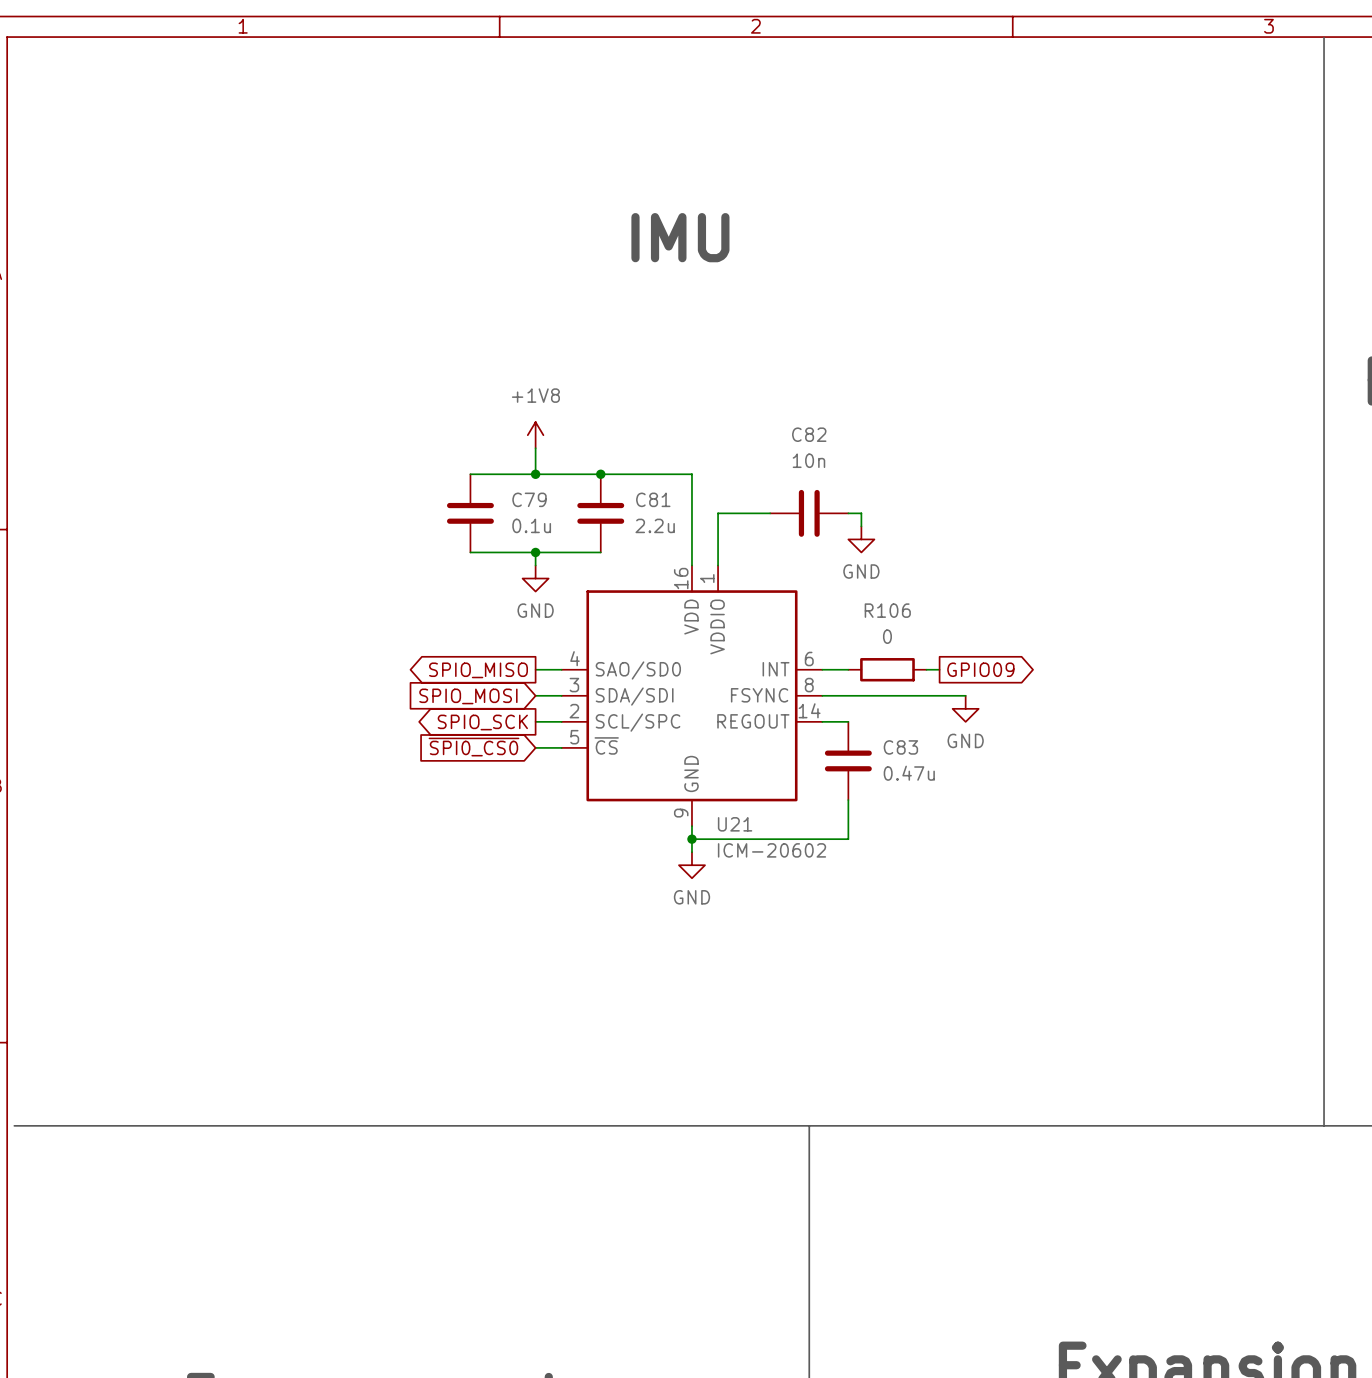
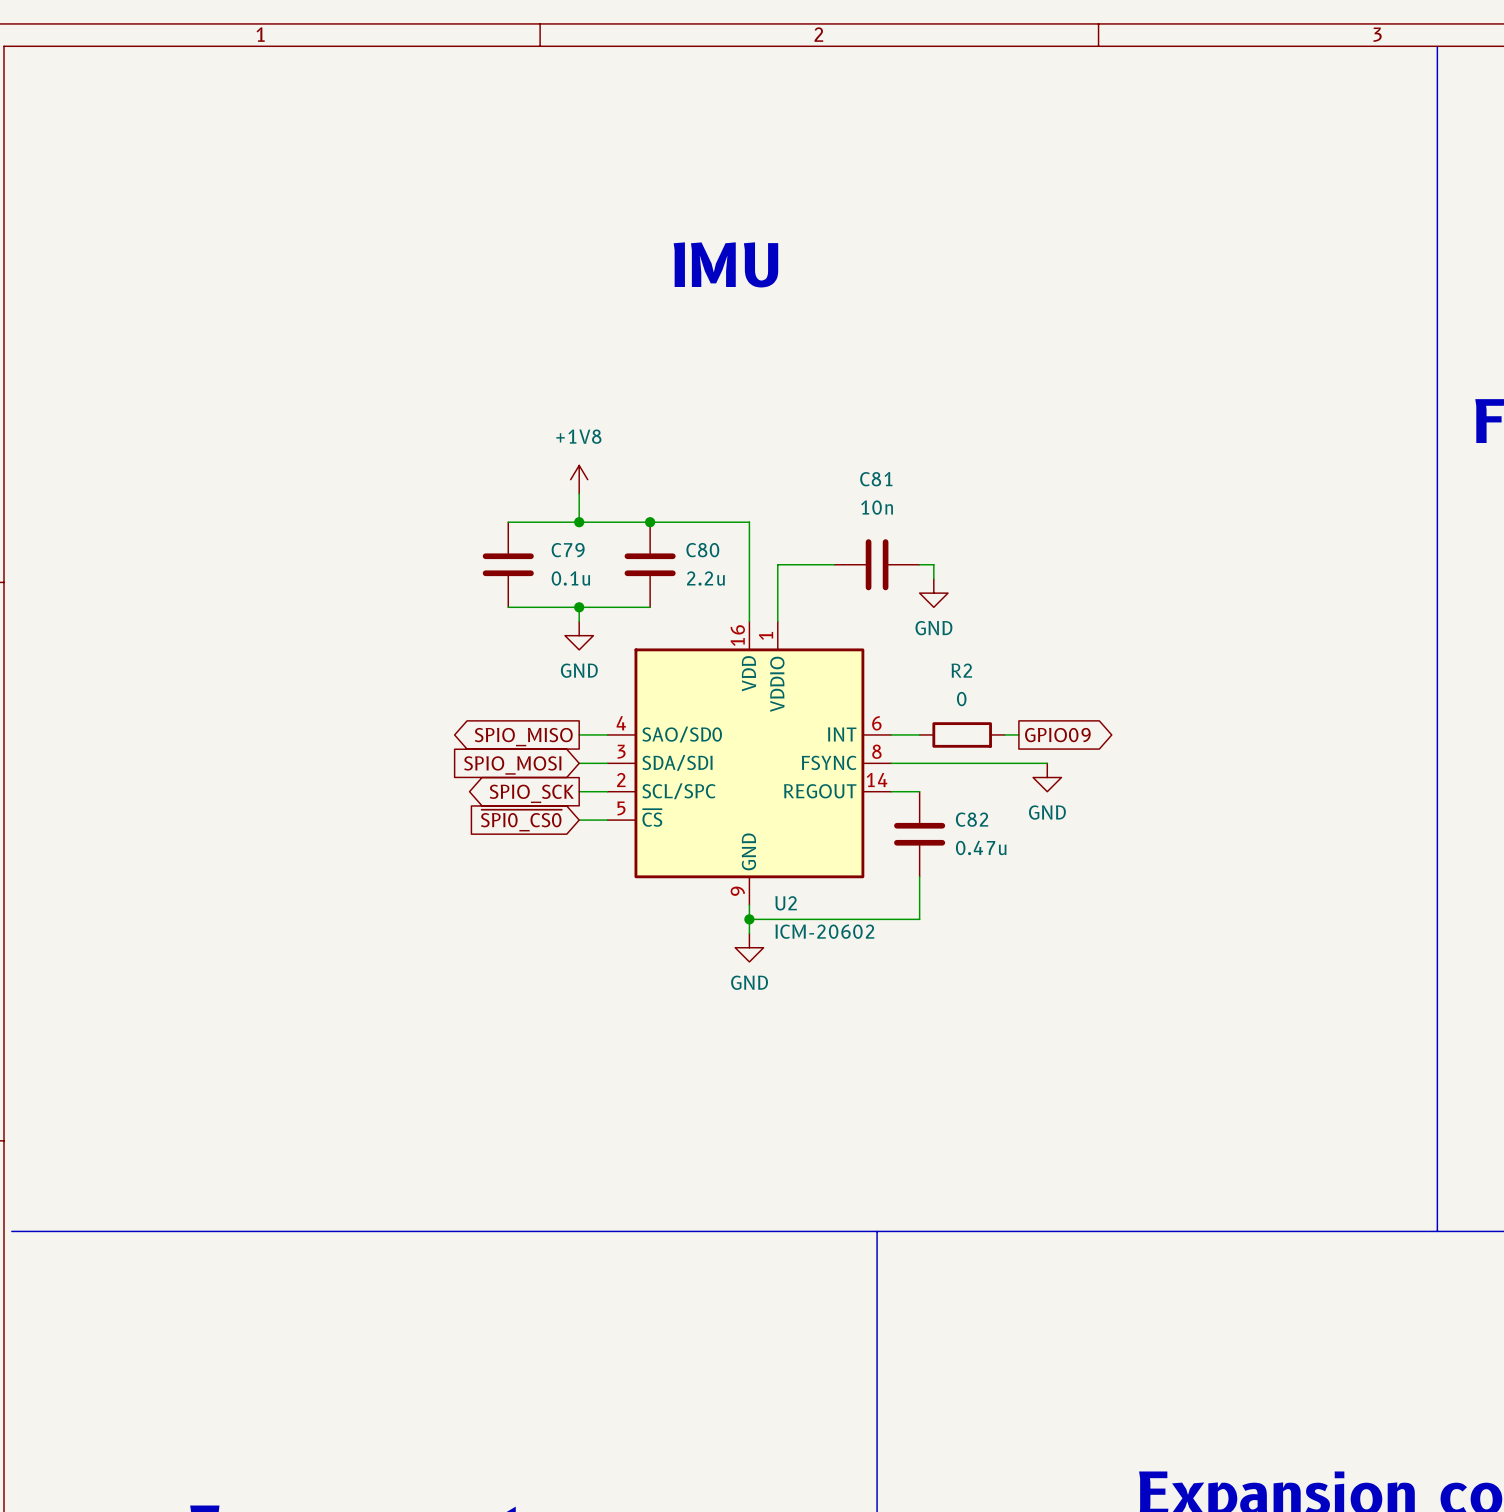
C82 name: C82 (809, 434) -> C81 (876, 479)
C81 name: C81 (653, 499) -> C80 (702, 550)
R106 name: R106 (887, 610) -> R2 (961, 670)
C83 name: C83 (900, 747) -> C82 (972, 819)
U21 name: U21 (735, 824) -> U2 (786, 903)

